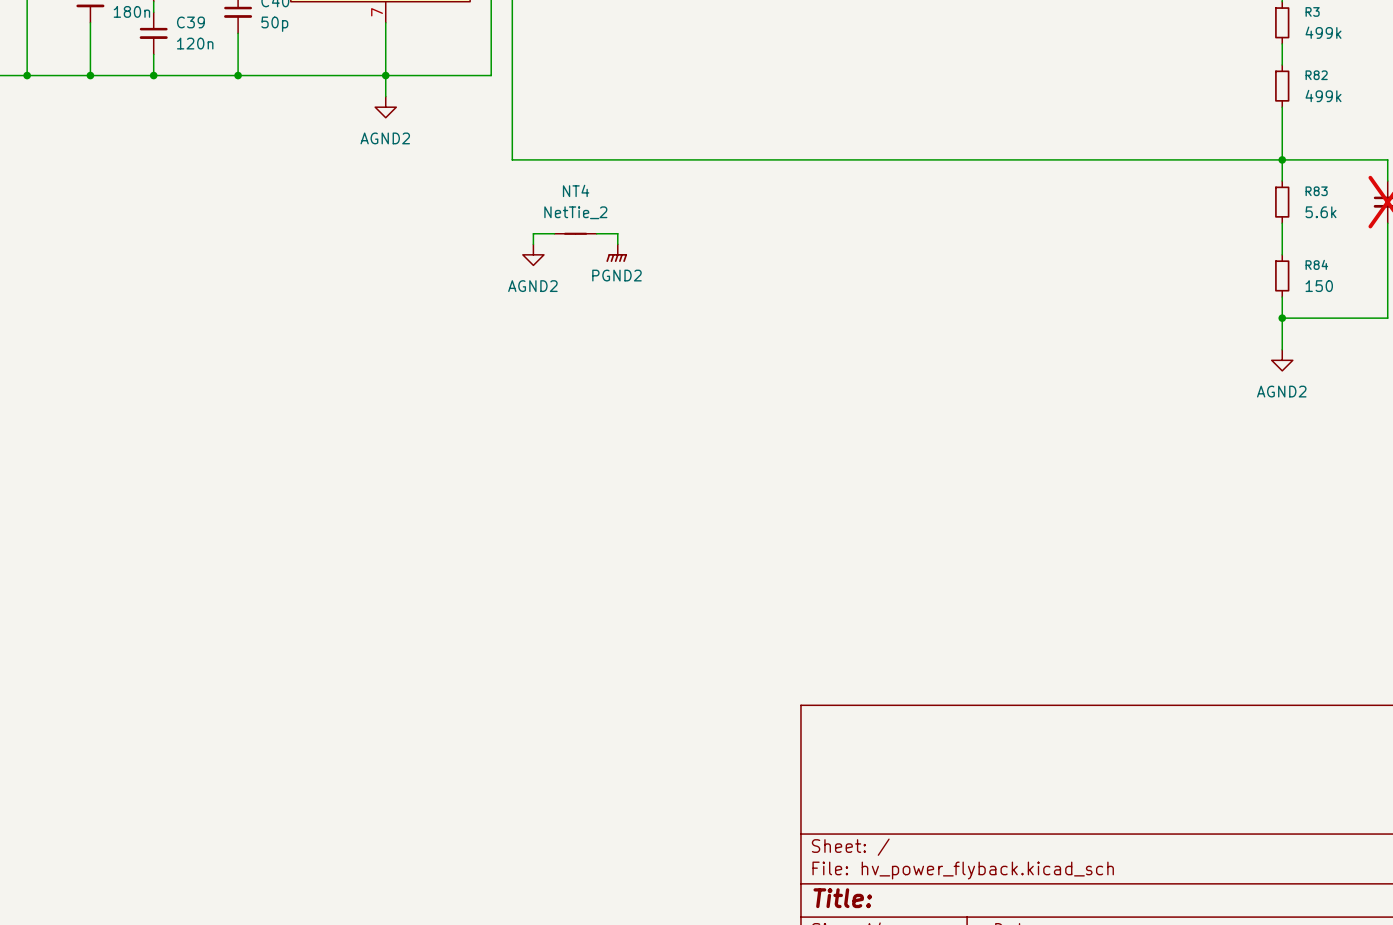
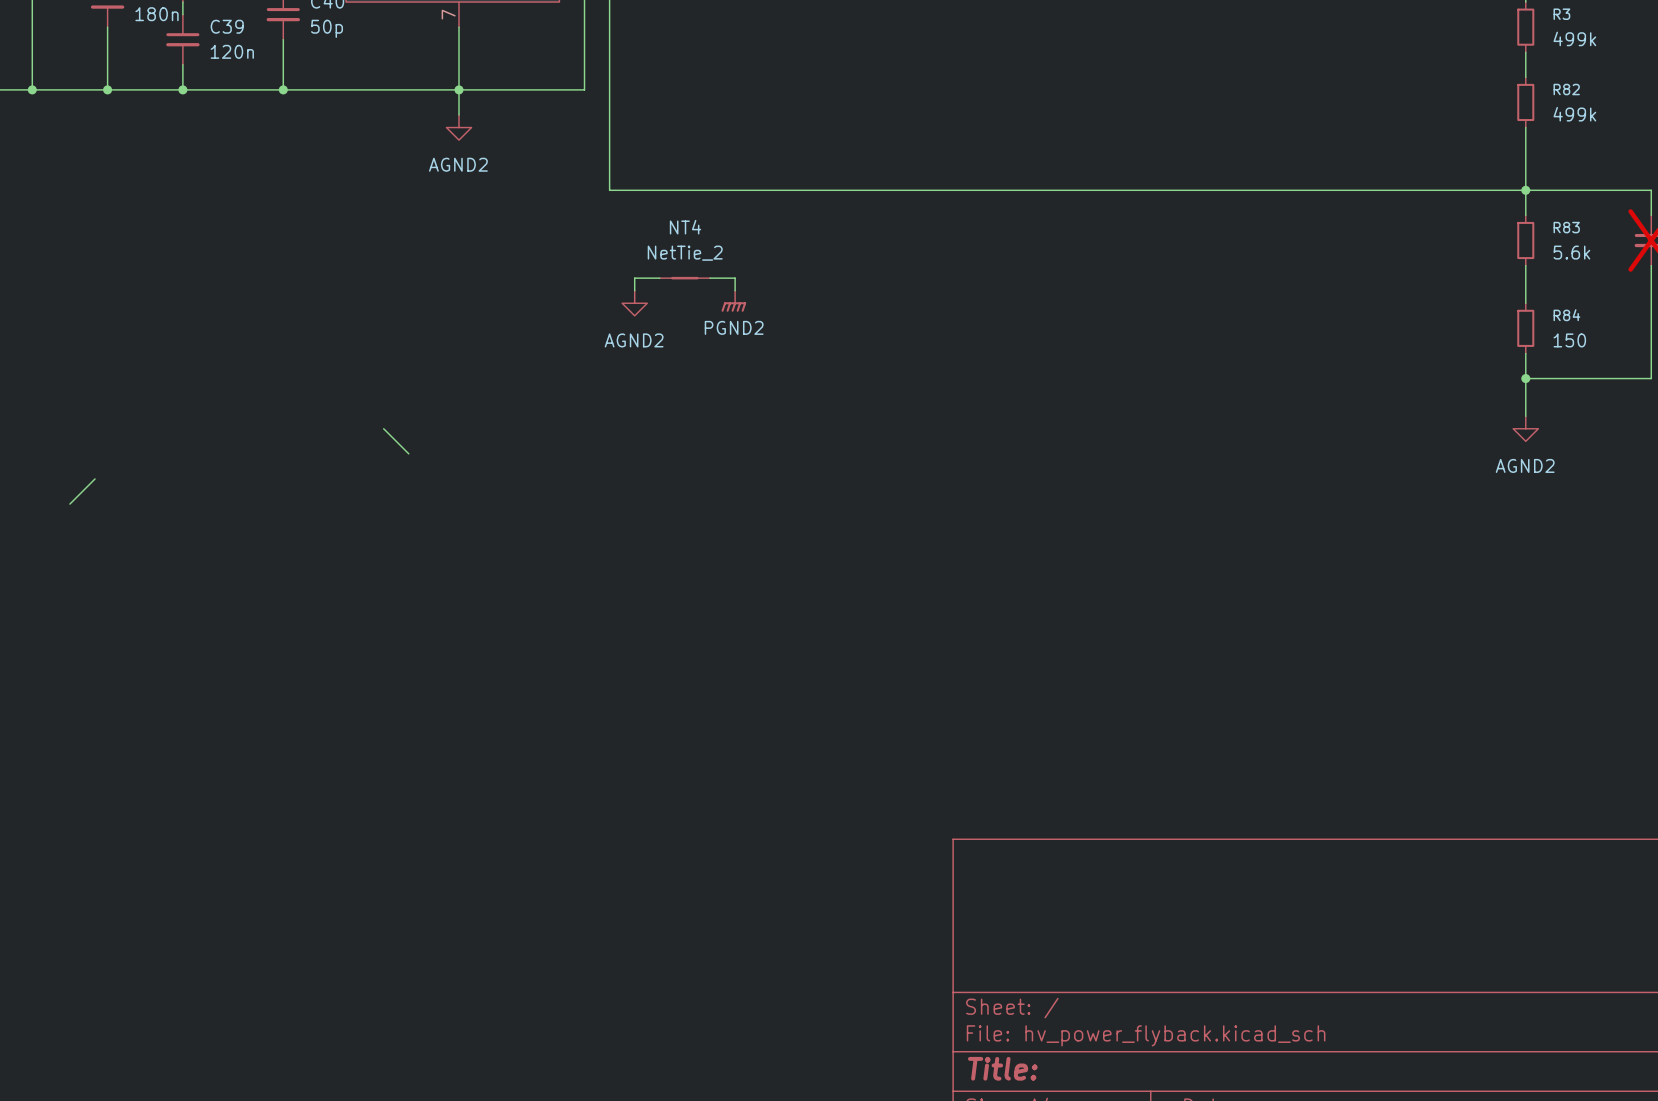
wire: none -> (383, 428) (408, 453)
wire: none -> (95, 478) (69, 504)

